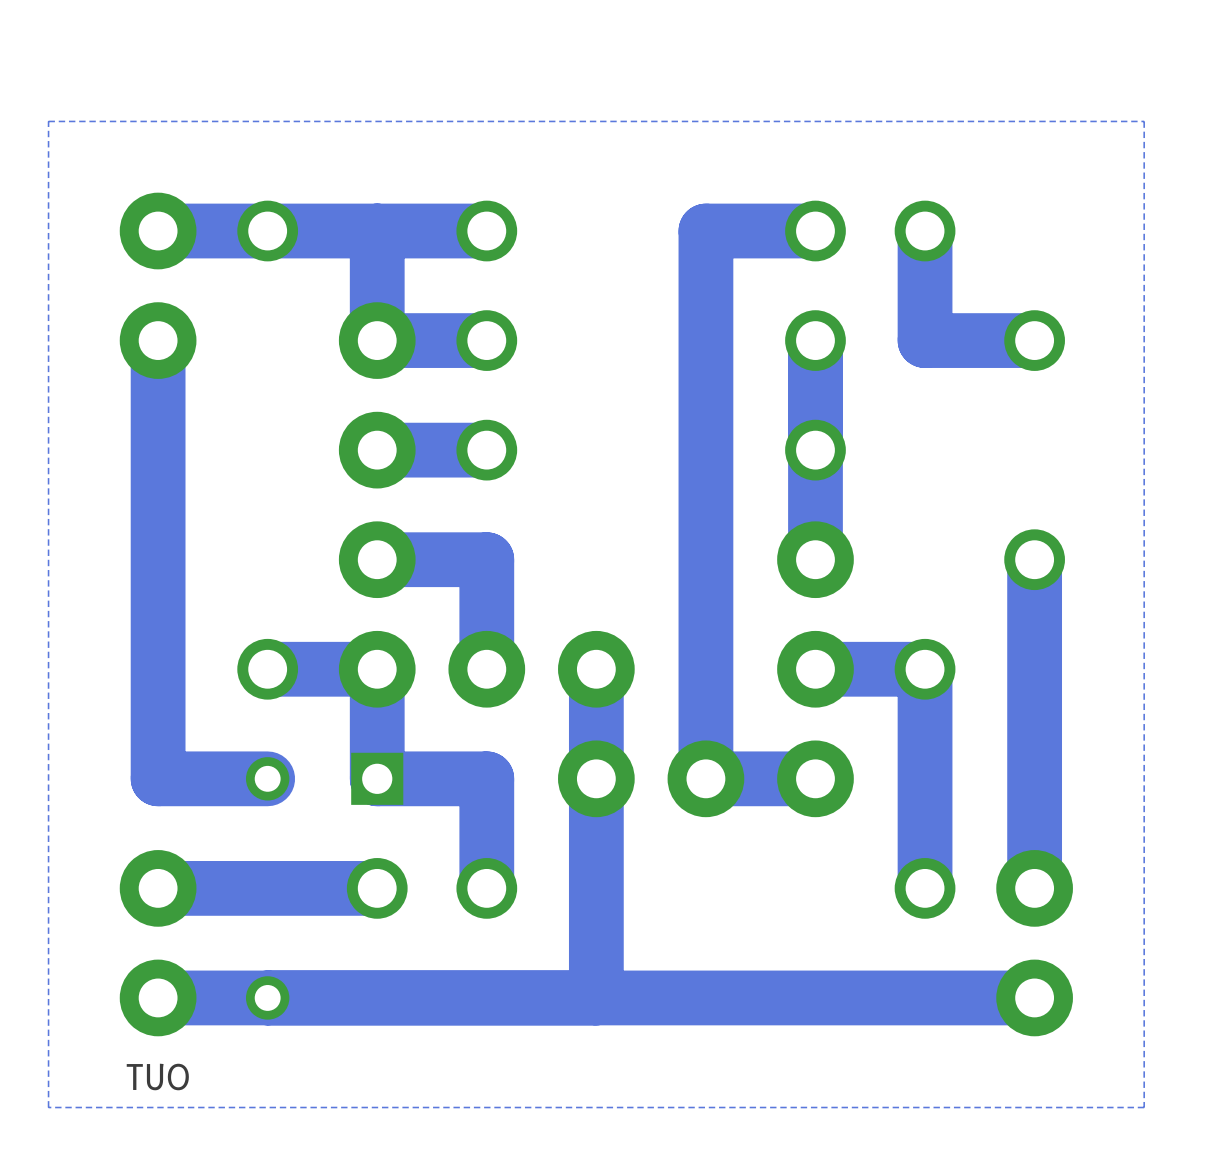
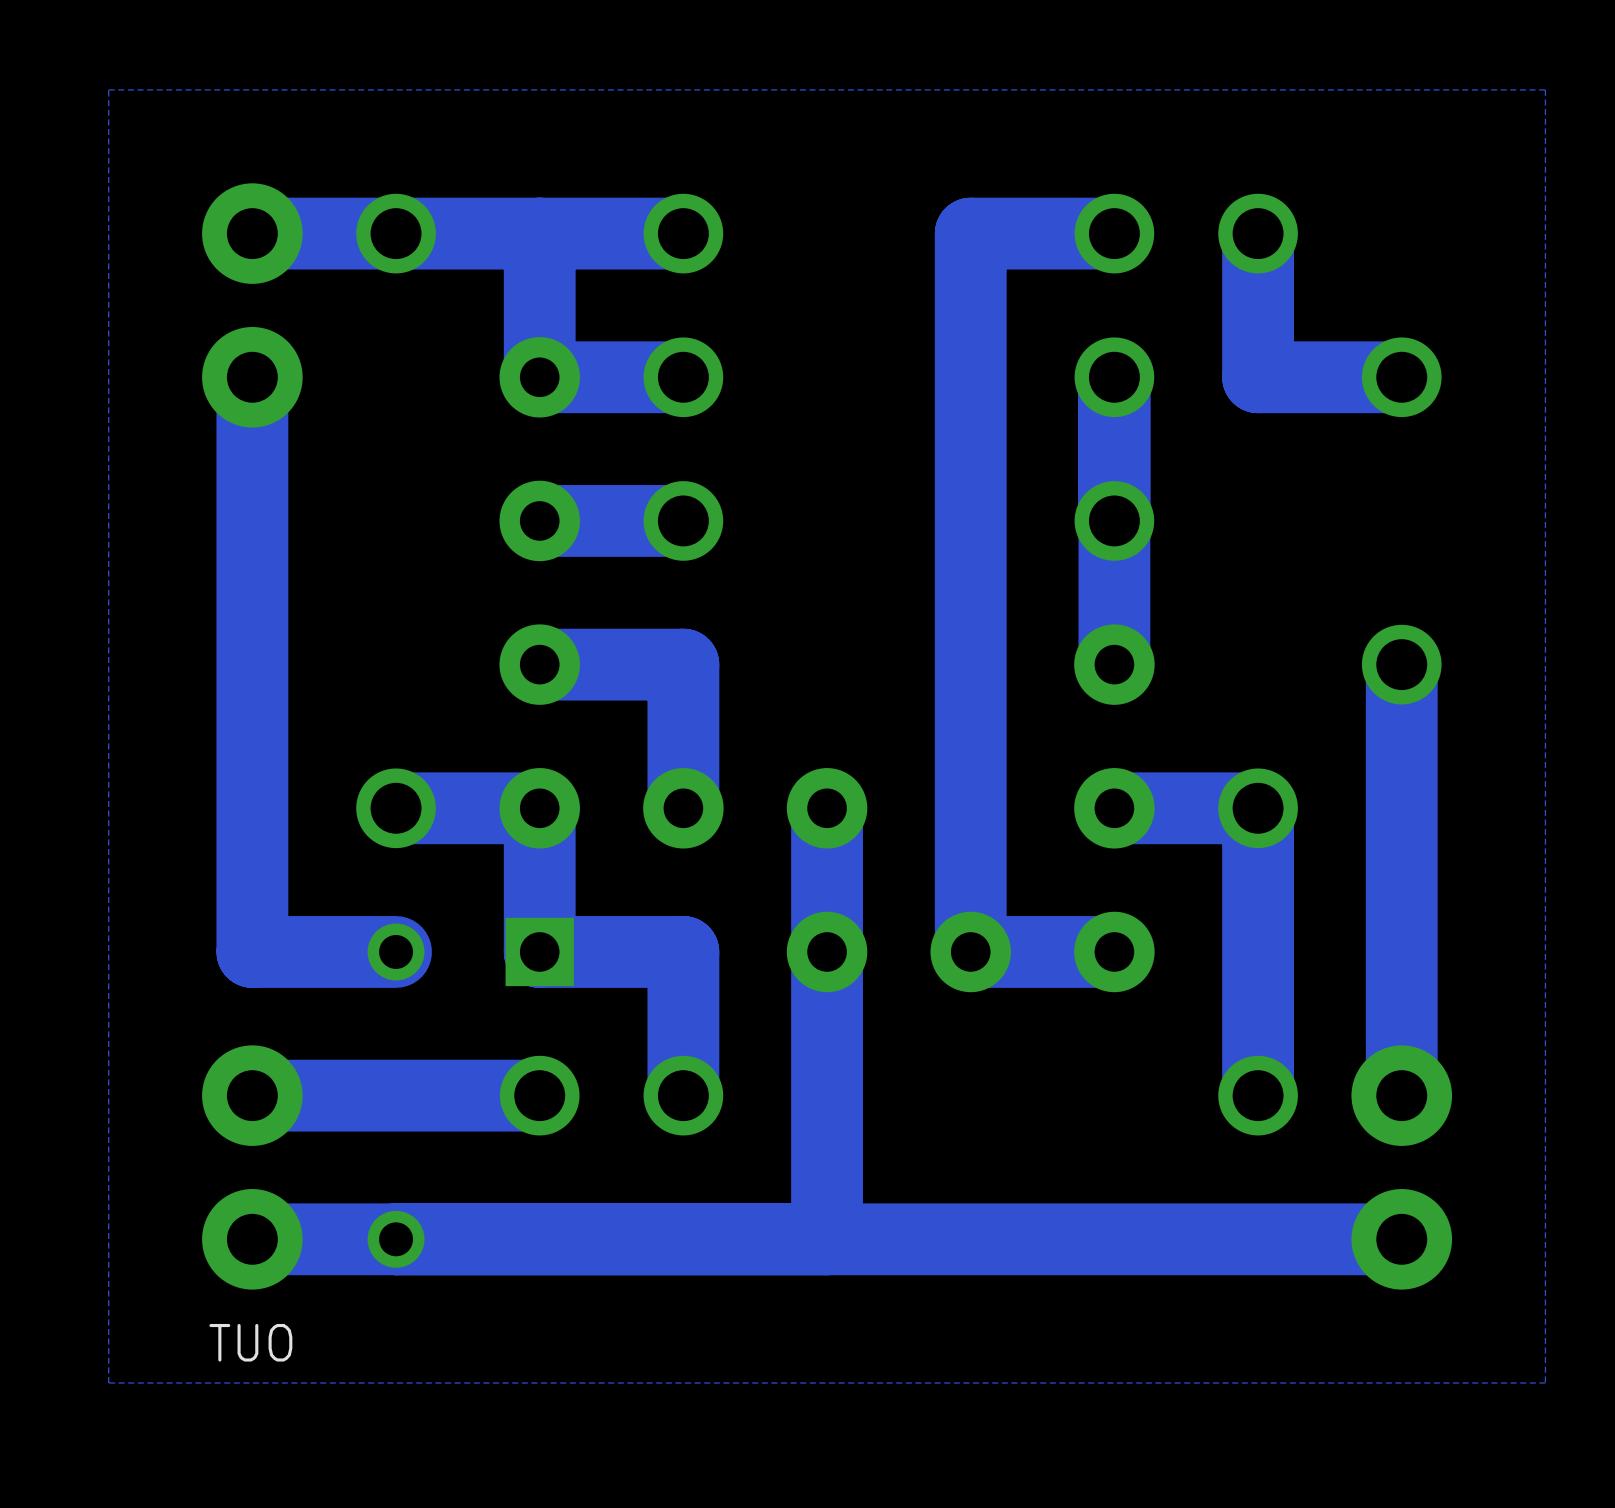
part footprint: [338, 302, 416, 599] -> [499, 337, 580, 705]
part footprint: [777, 521, 854, 818] -> [1074, 624, 1155, 993]
part footprint: [338, 630, 635, 708] -> [499, 768, 868, 849]
part footprint: [558, 740, 745, 818] -> [786, 911, 1011, 993]

